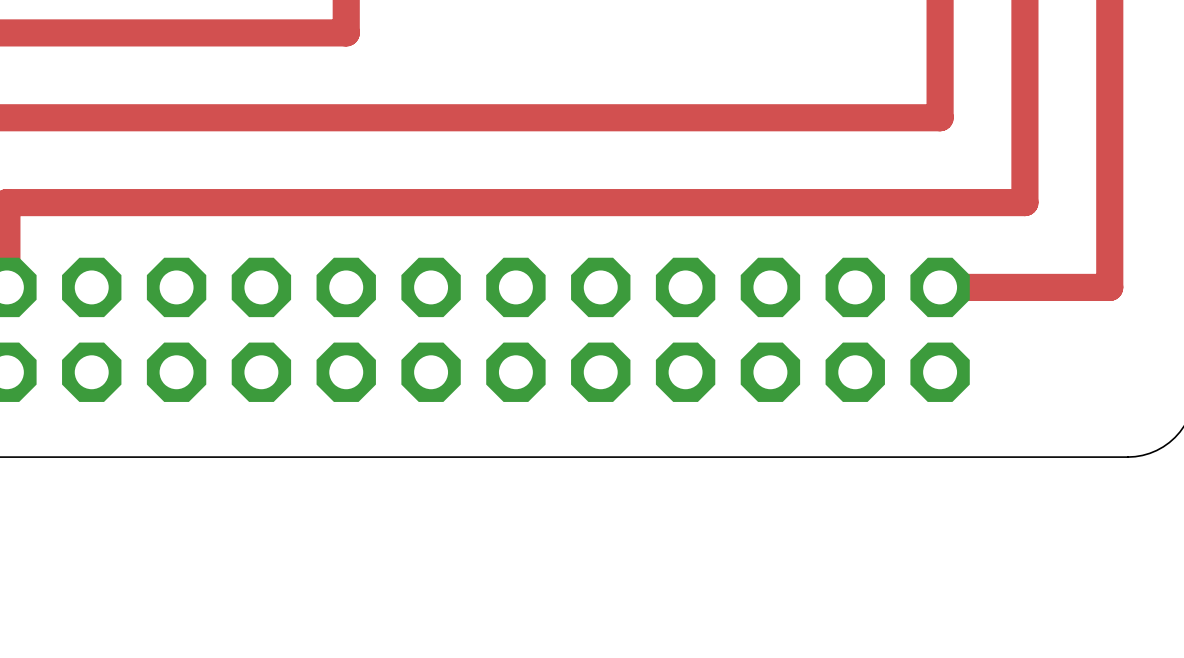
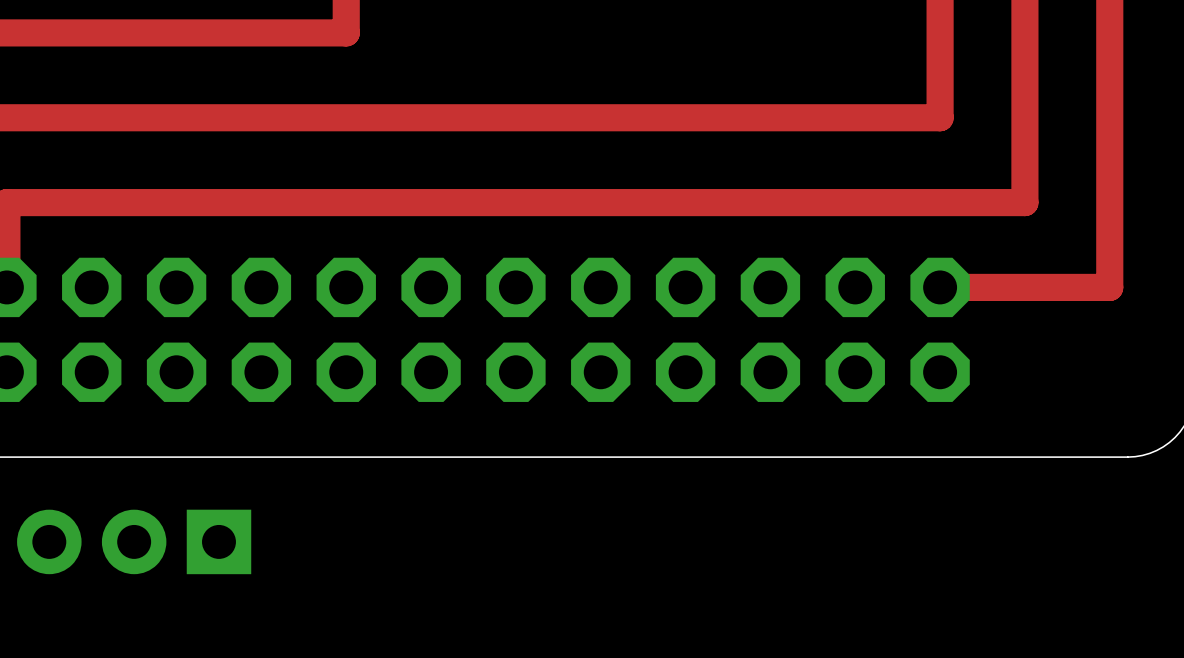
part: none -> (134, 541)

